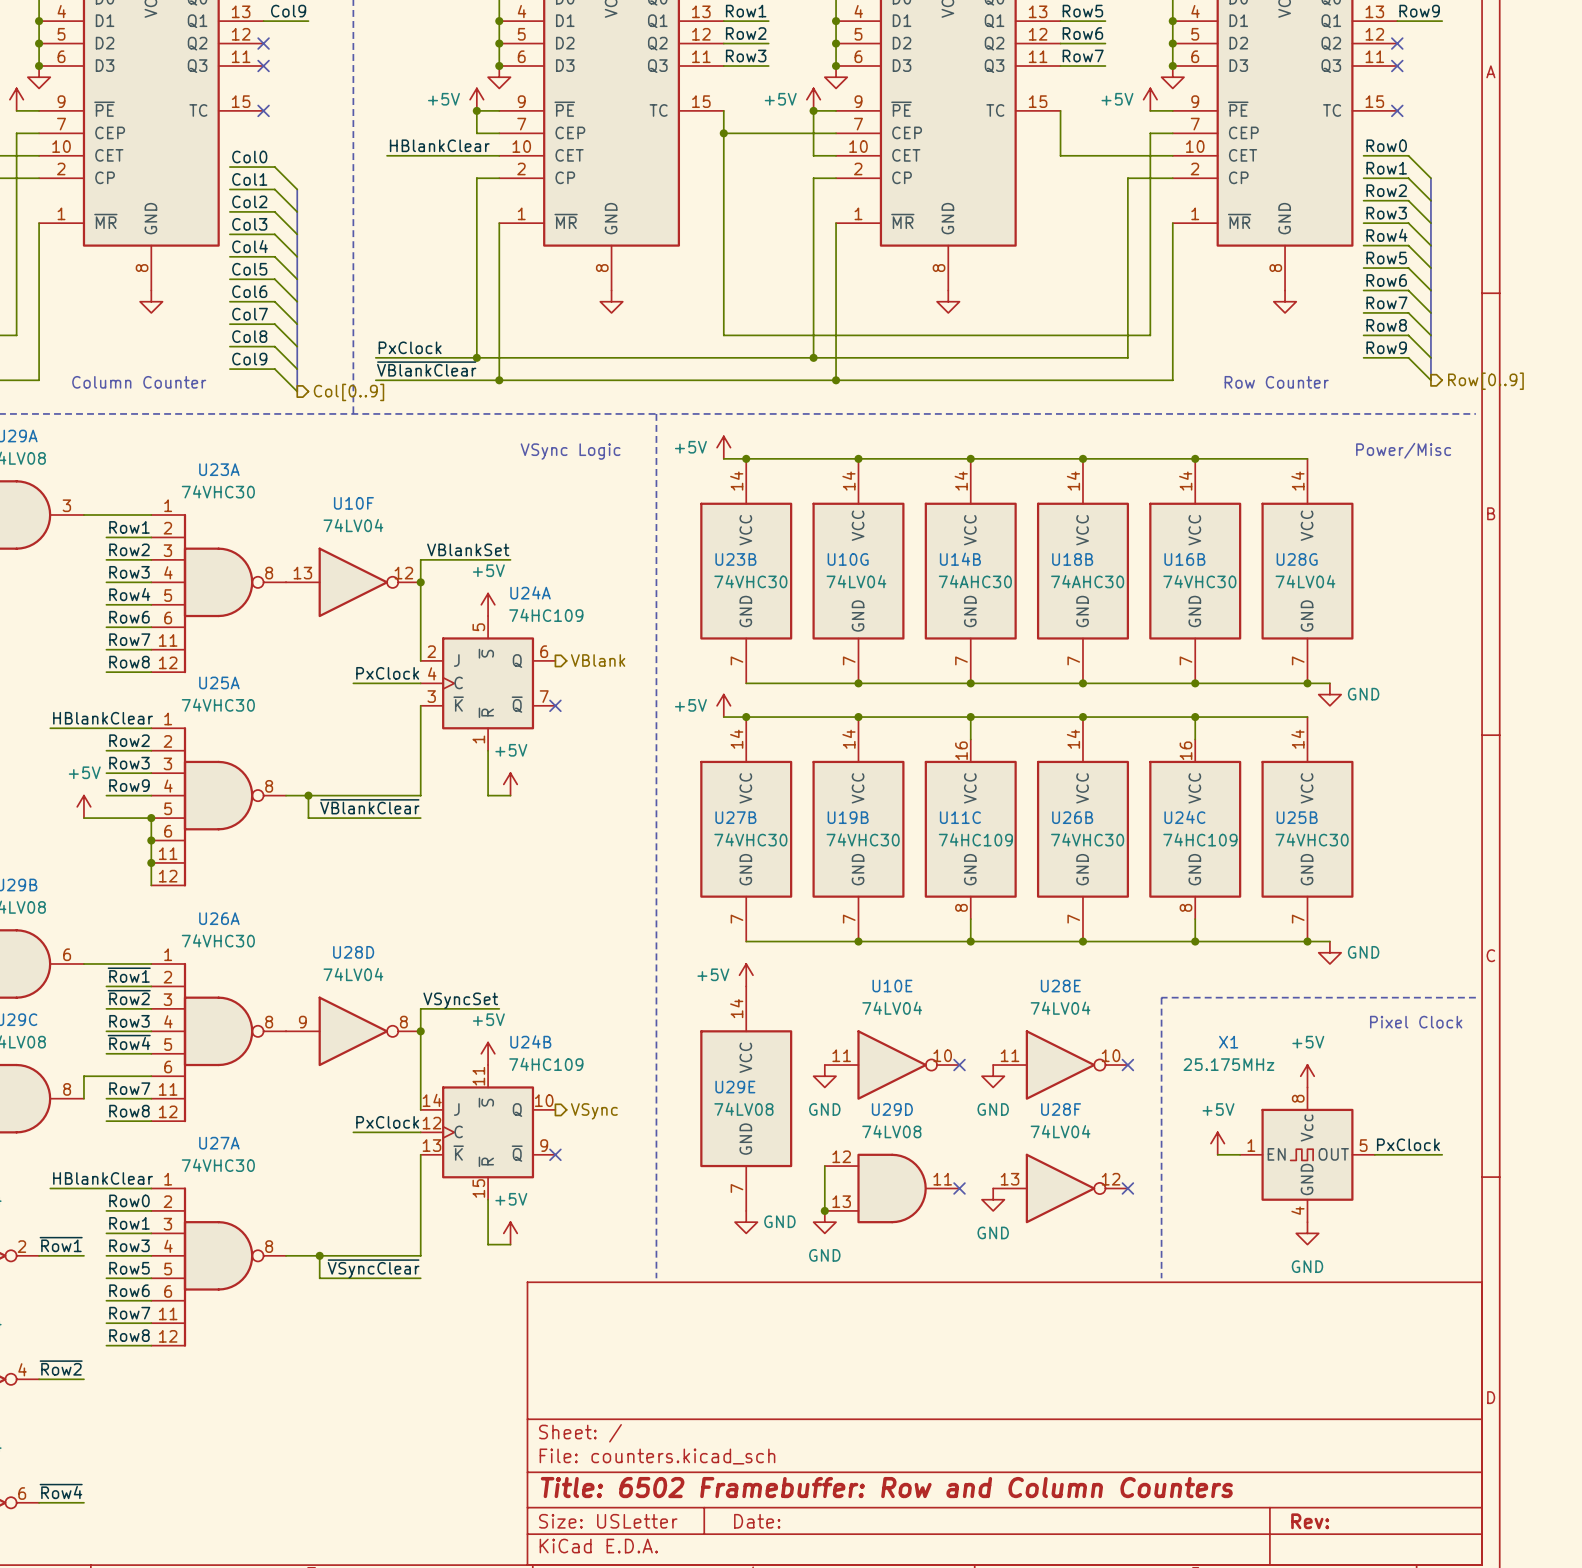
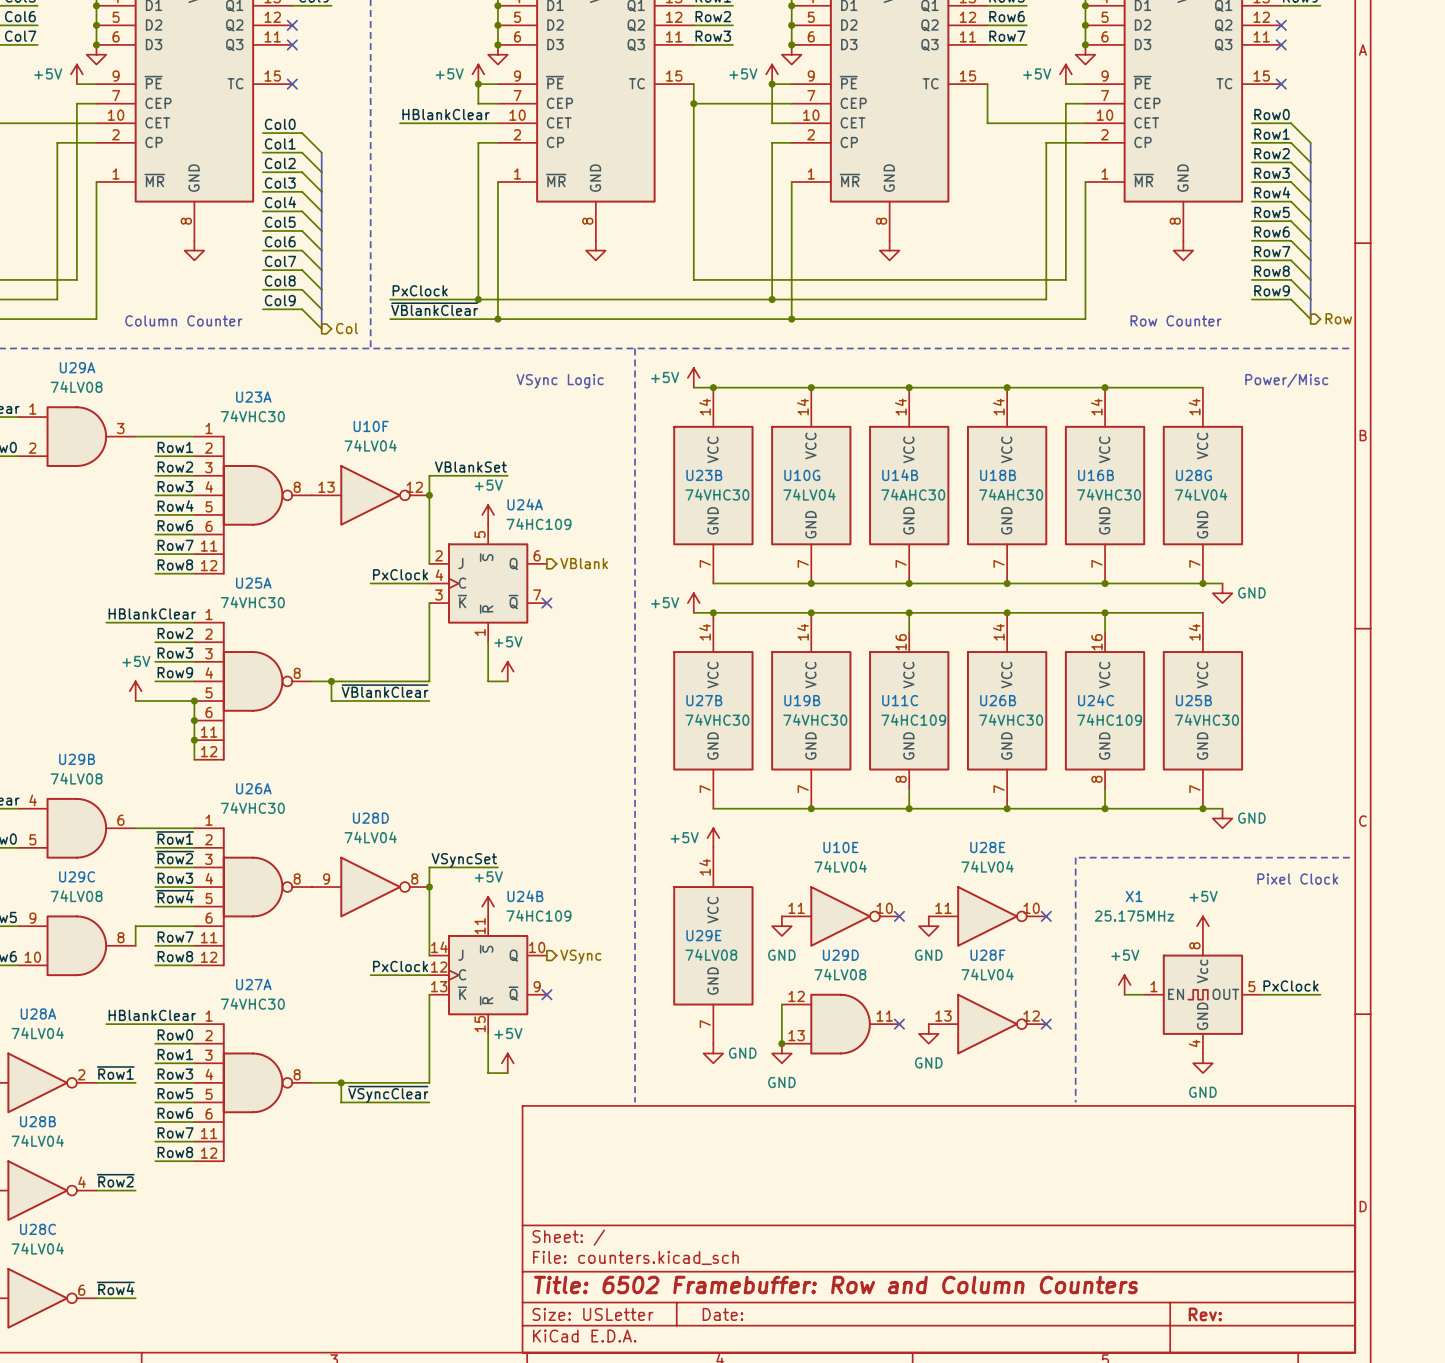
hierarchical label: Row[0..9] (1485, 381) -> Row (1338, 318)
hierarchical label: Col[0..9] (349, 392) -> Col (347, 328)

